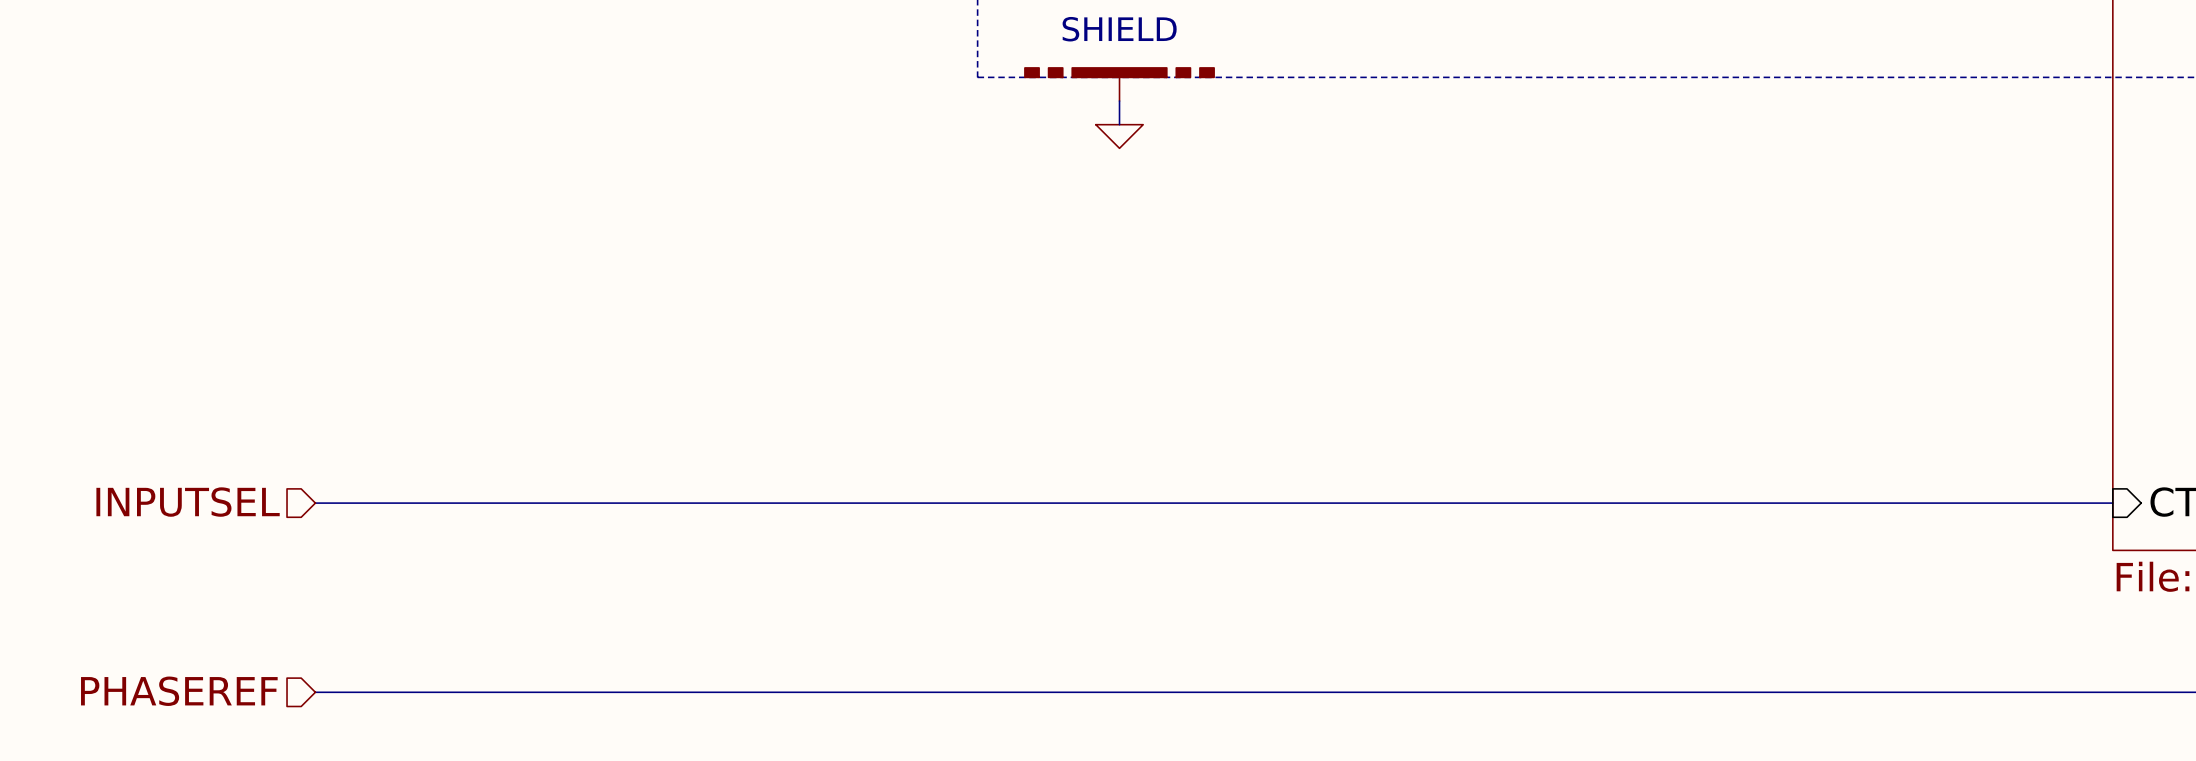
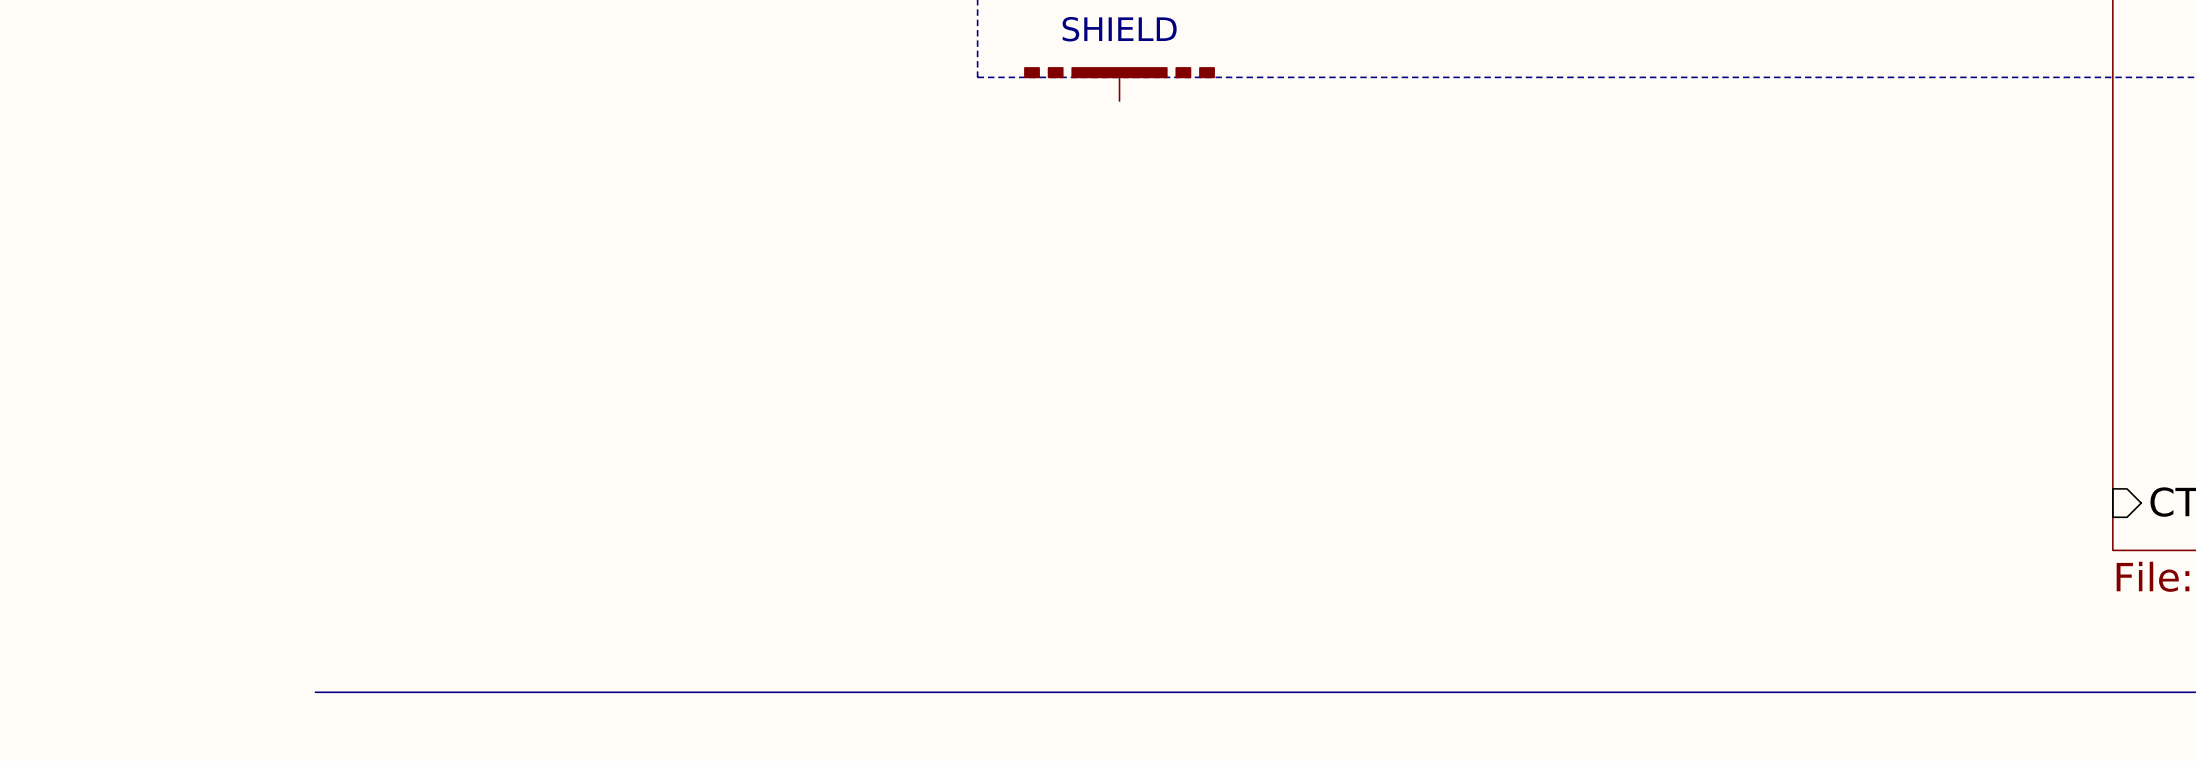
wire: (1119, 101) (1119, 124) -> none
power symbol: (1119, 136) -> none
hierarchical label: INPUTSEL (188, 502) -> none
wire: (315, 503) (2112, 503) -> none
hierarchical label: PHASEREF (179, 691) -> none

